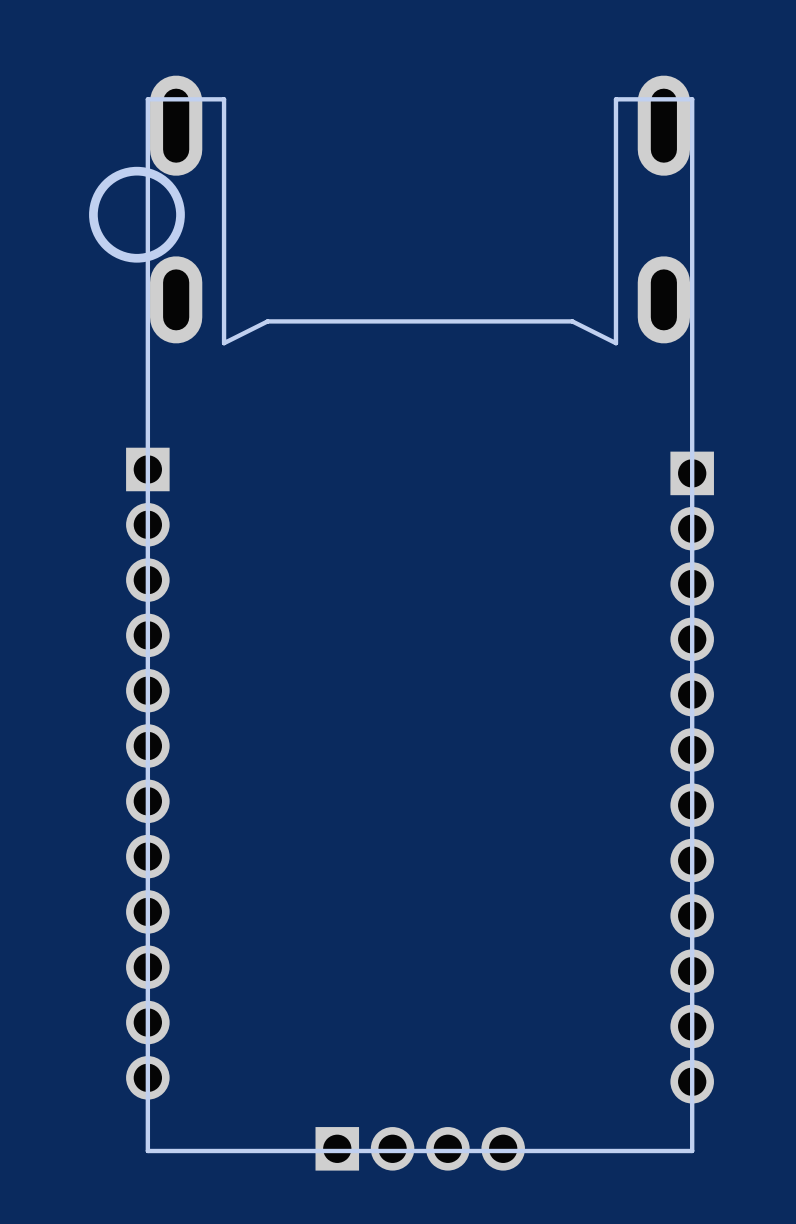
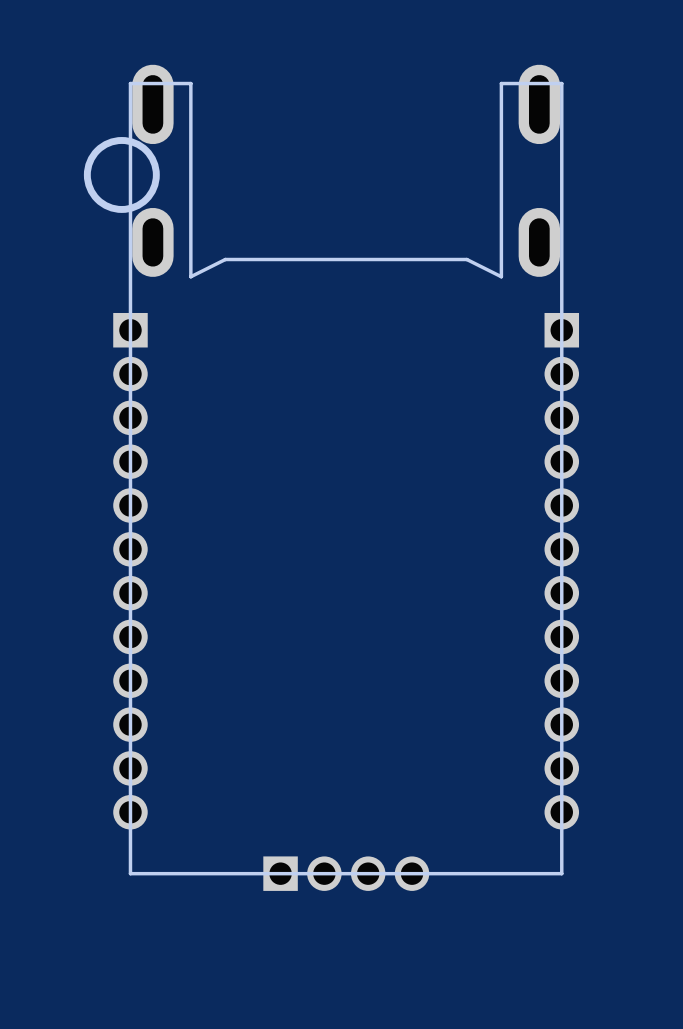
part position: (147, 773) -> (130, 571)
part position: (692, 777) -> (561, 571)
board edge: (692, 1096) (692, 1150) (147, 1150) (147, 1096) -> (561, 873) (130, 873)
part position: (420, 1148) -> (346, 873)

